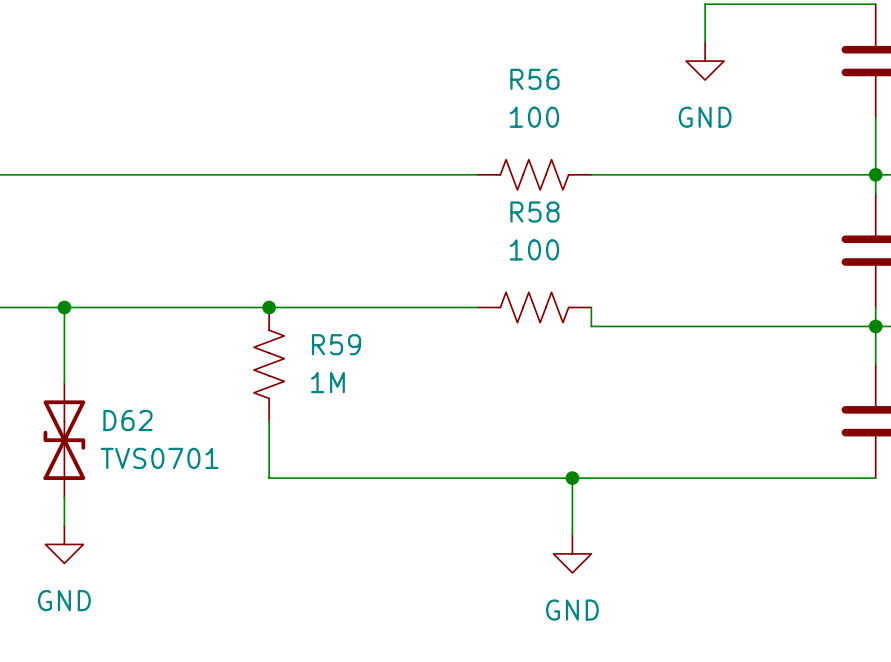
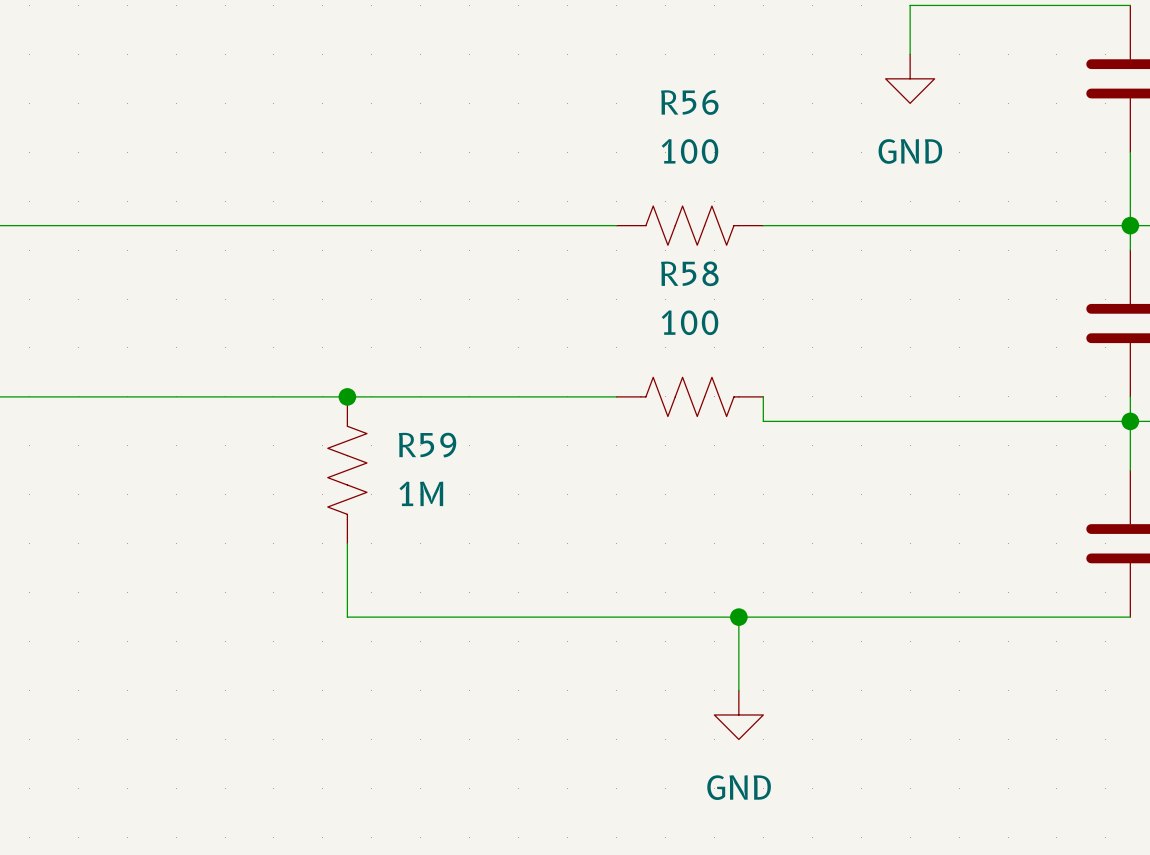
wire: (64, 307) (64, 383) -> none
junction: (64, 307) -> none
D62: TVS0701 (64, 440) -> none
wire: (64, 497) (64, 525) -> none
power symbol: GND (64, 544) -> none

